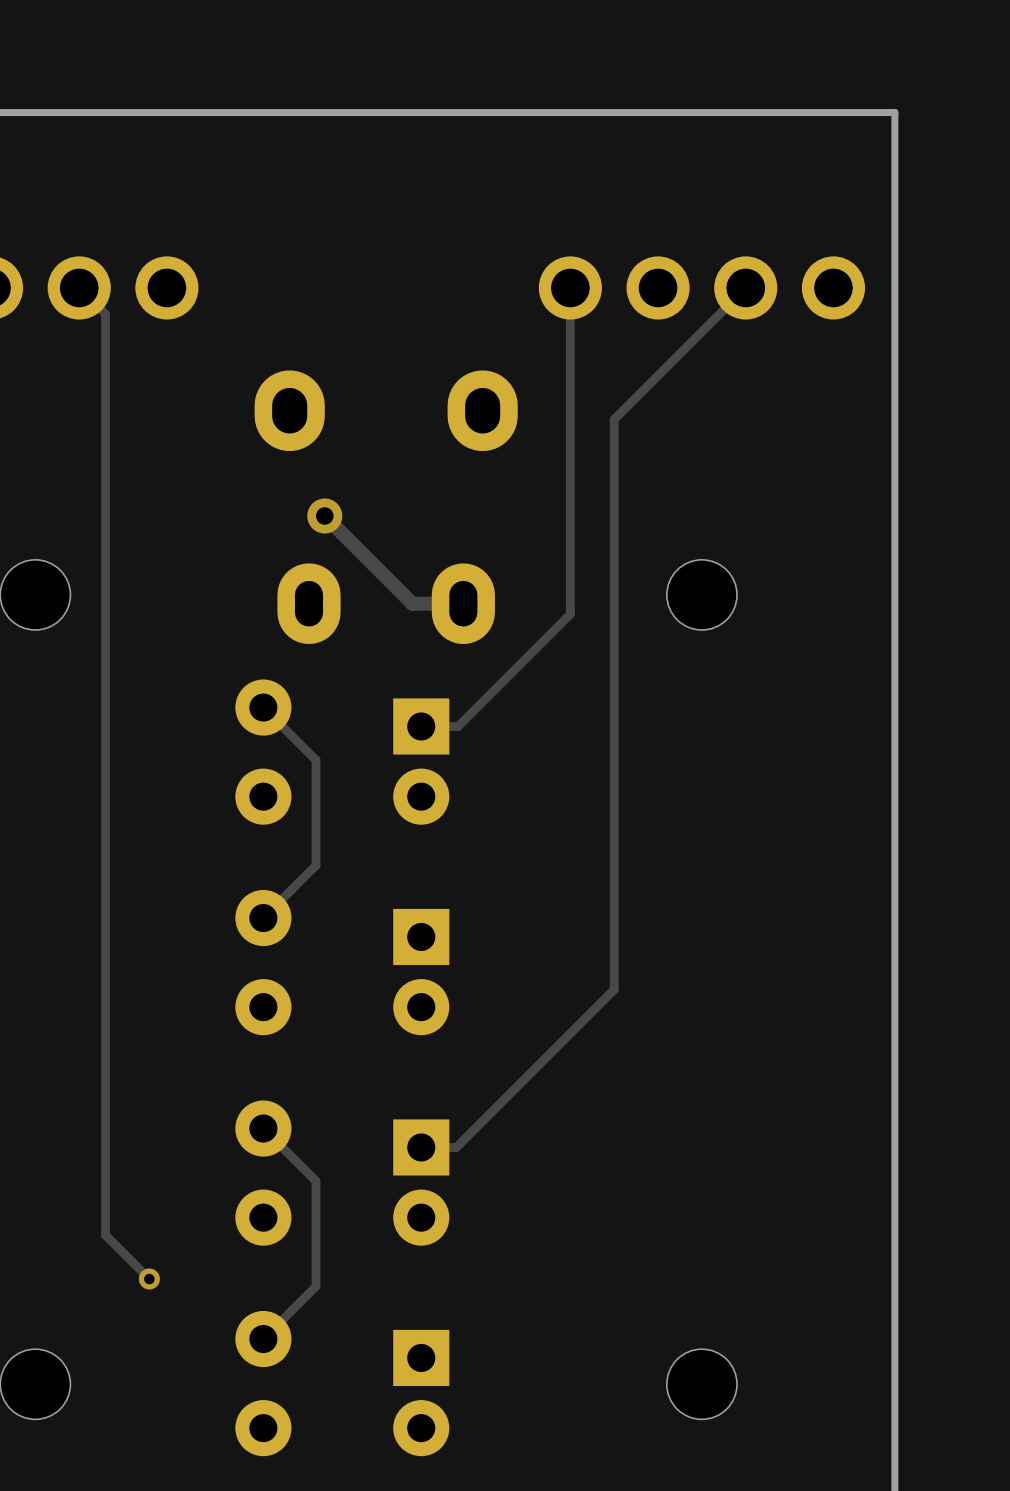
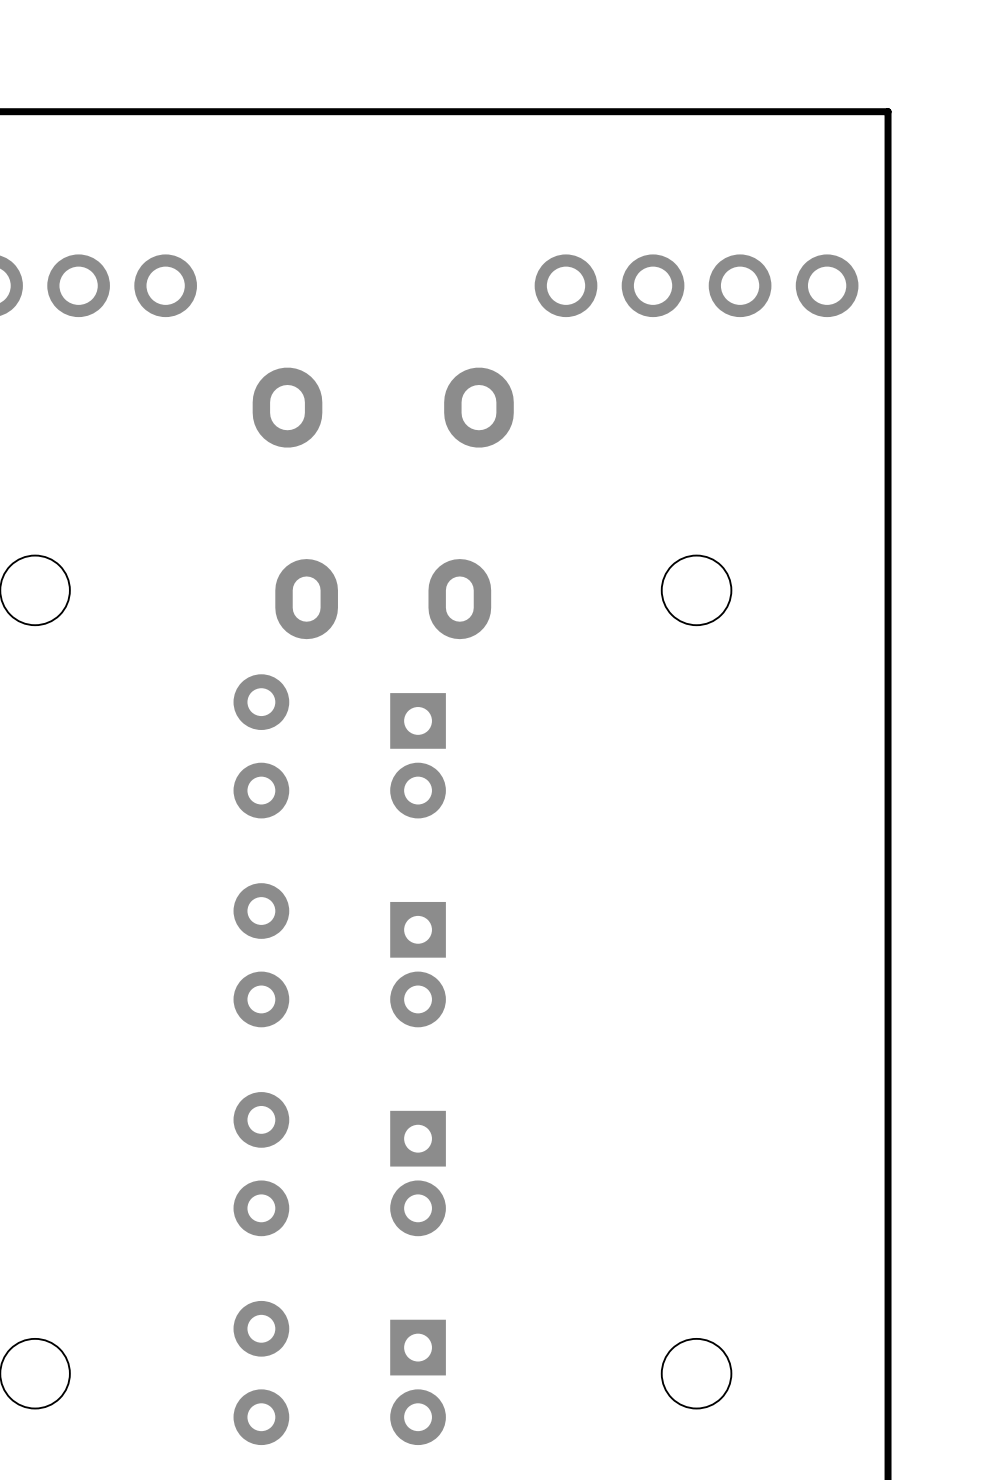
track: (79, 287) (105, 314) (105, 1235) (149, 1279) -> none
track: (570, 287) (570, 614) (458, 726) (421, 726) -> none
track: (745, 287) (614, 419) (614, 989) (456, 1147) (421, 1147) -> none
track: (324, 515) (412, 603) (463, 603) -> none
via: (324, 515) -> none
track: (263, 707) (316, 760) (316, 865) (263, 918) -> none
track: (263, 1128) (316, 1181) (316, 1286) (263, 1339) -> none
via: (149, 1279) -> none

